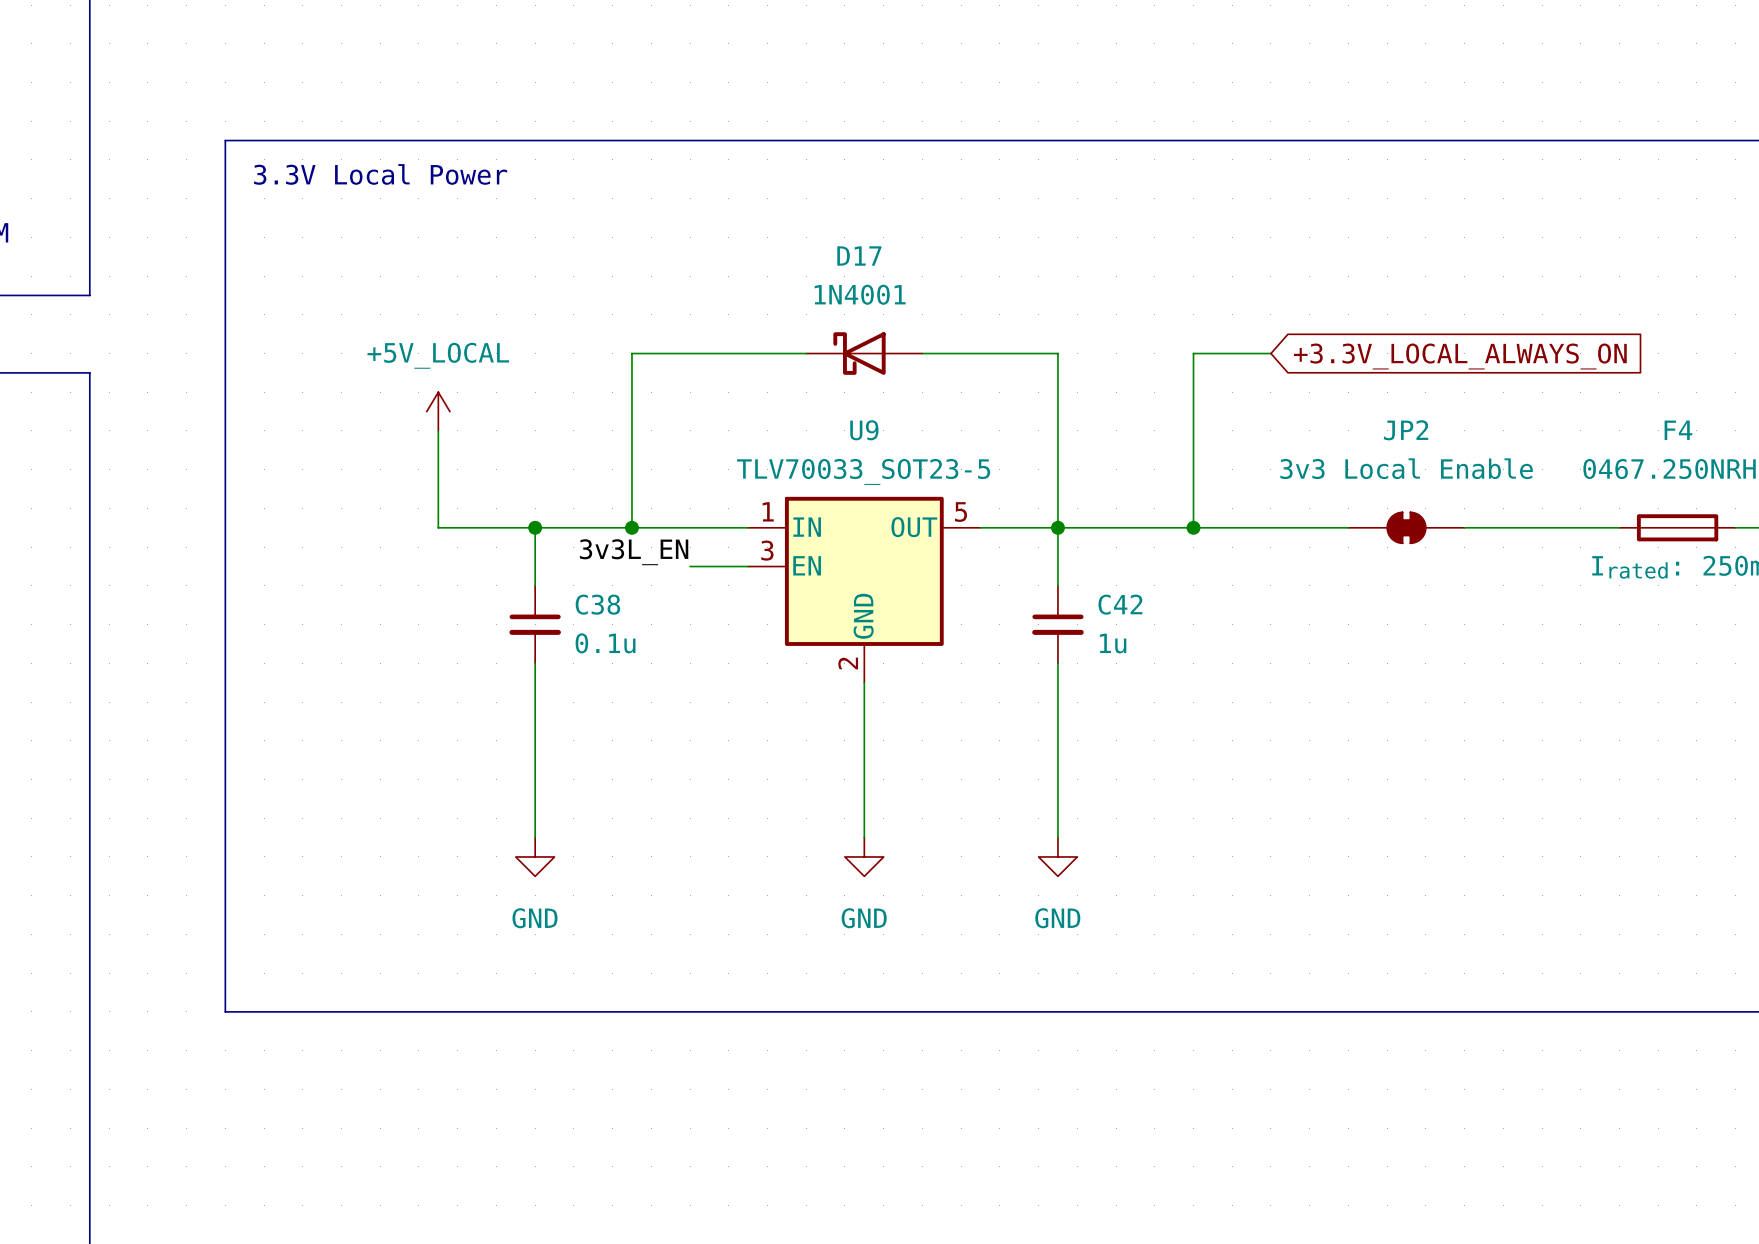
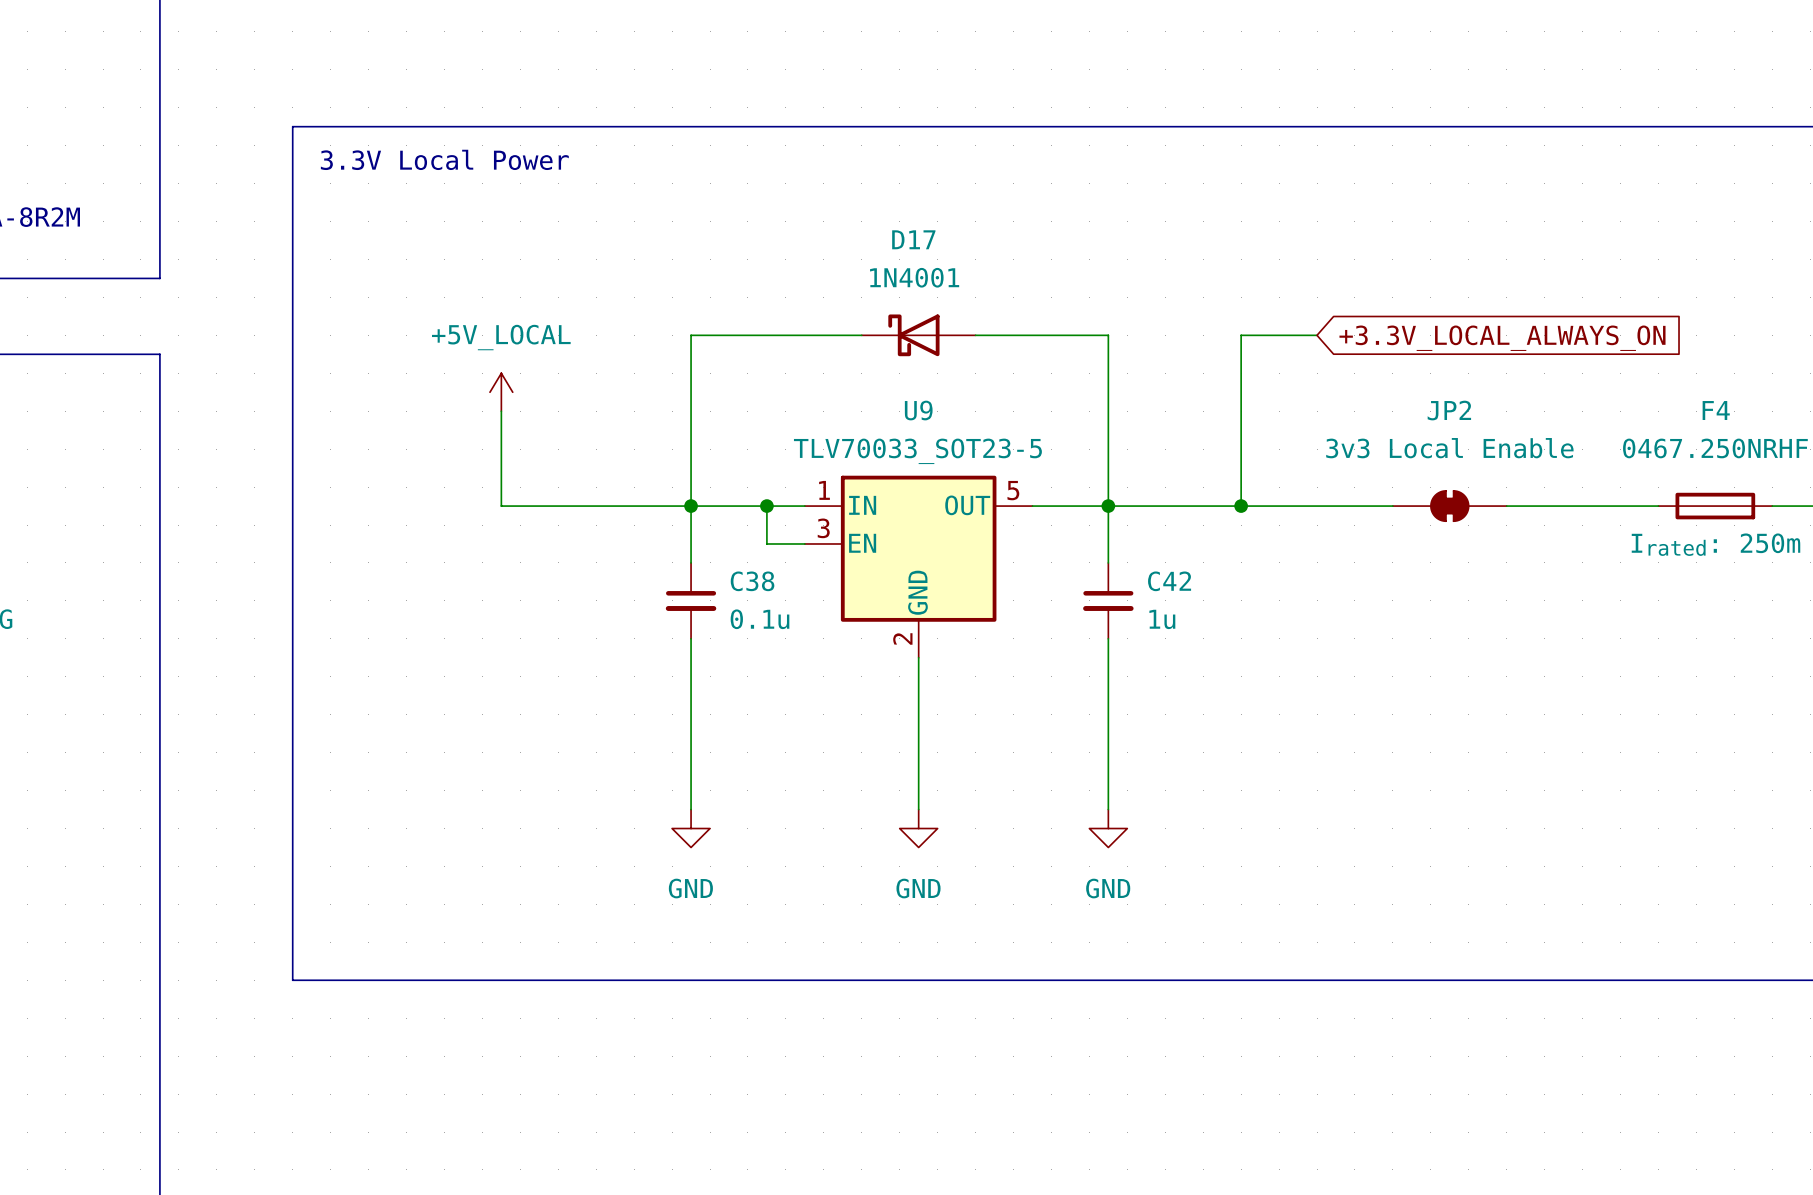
wire: (535, 527) (535, 585) -> (691, 506) (691, 562)
junction: (535, 527) -> none
junction: none -> (766, 506)
label: 3v3L_EN (634, 552) -> none
wire: (690, 566) (709, 566) -> (766, 506) (766, 543)
C38 position: (535, 624) -> (691, 600)
wire: (535, 663) (535, 837) -> (691, 638) (691, 809)
power symbol position: GND (535, 856) -> GND (691, 828)

